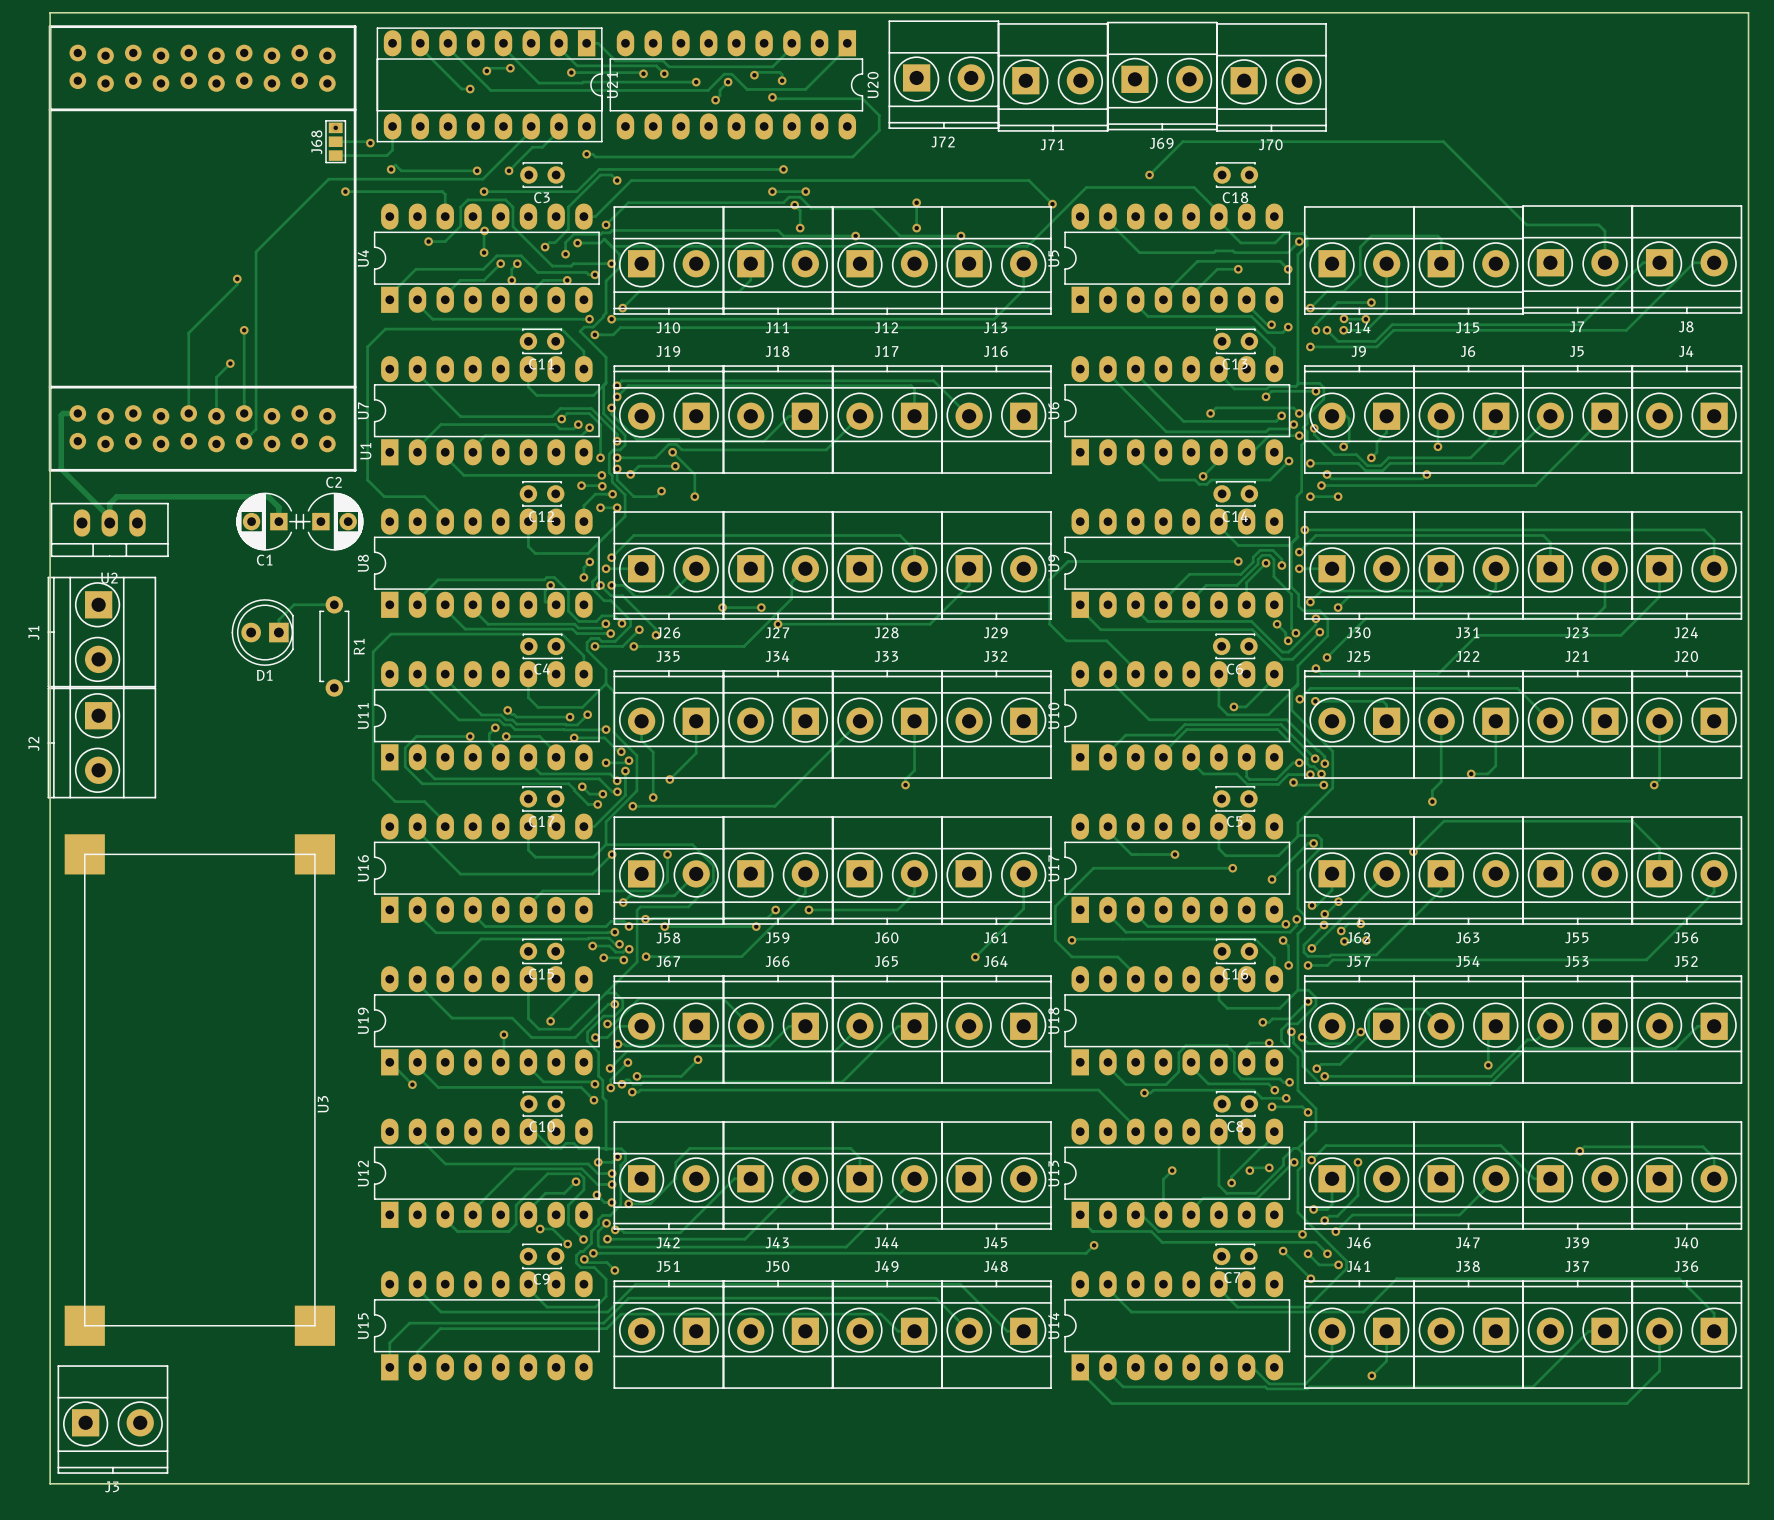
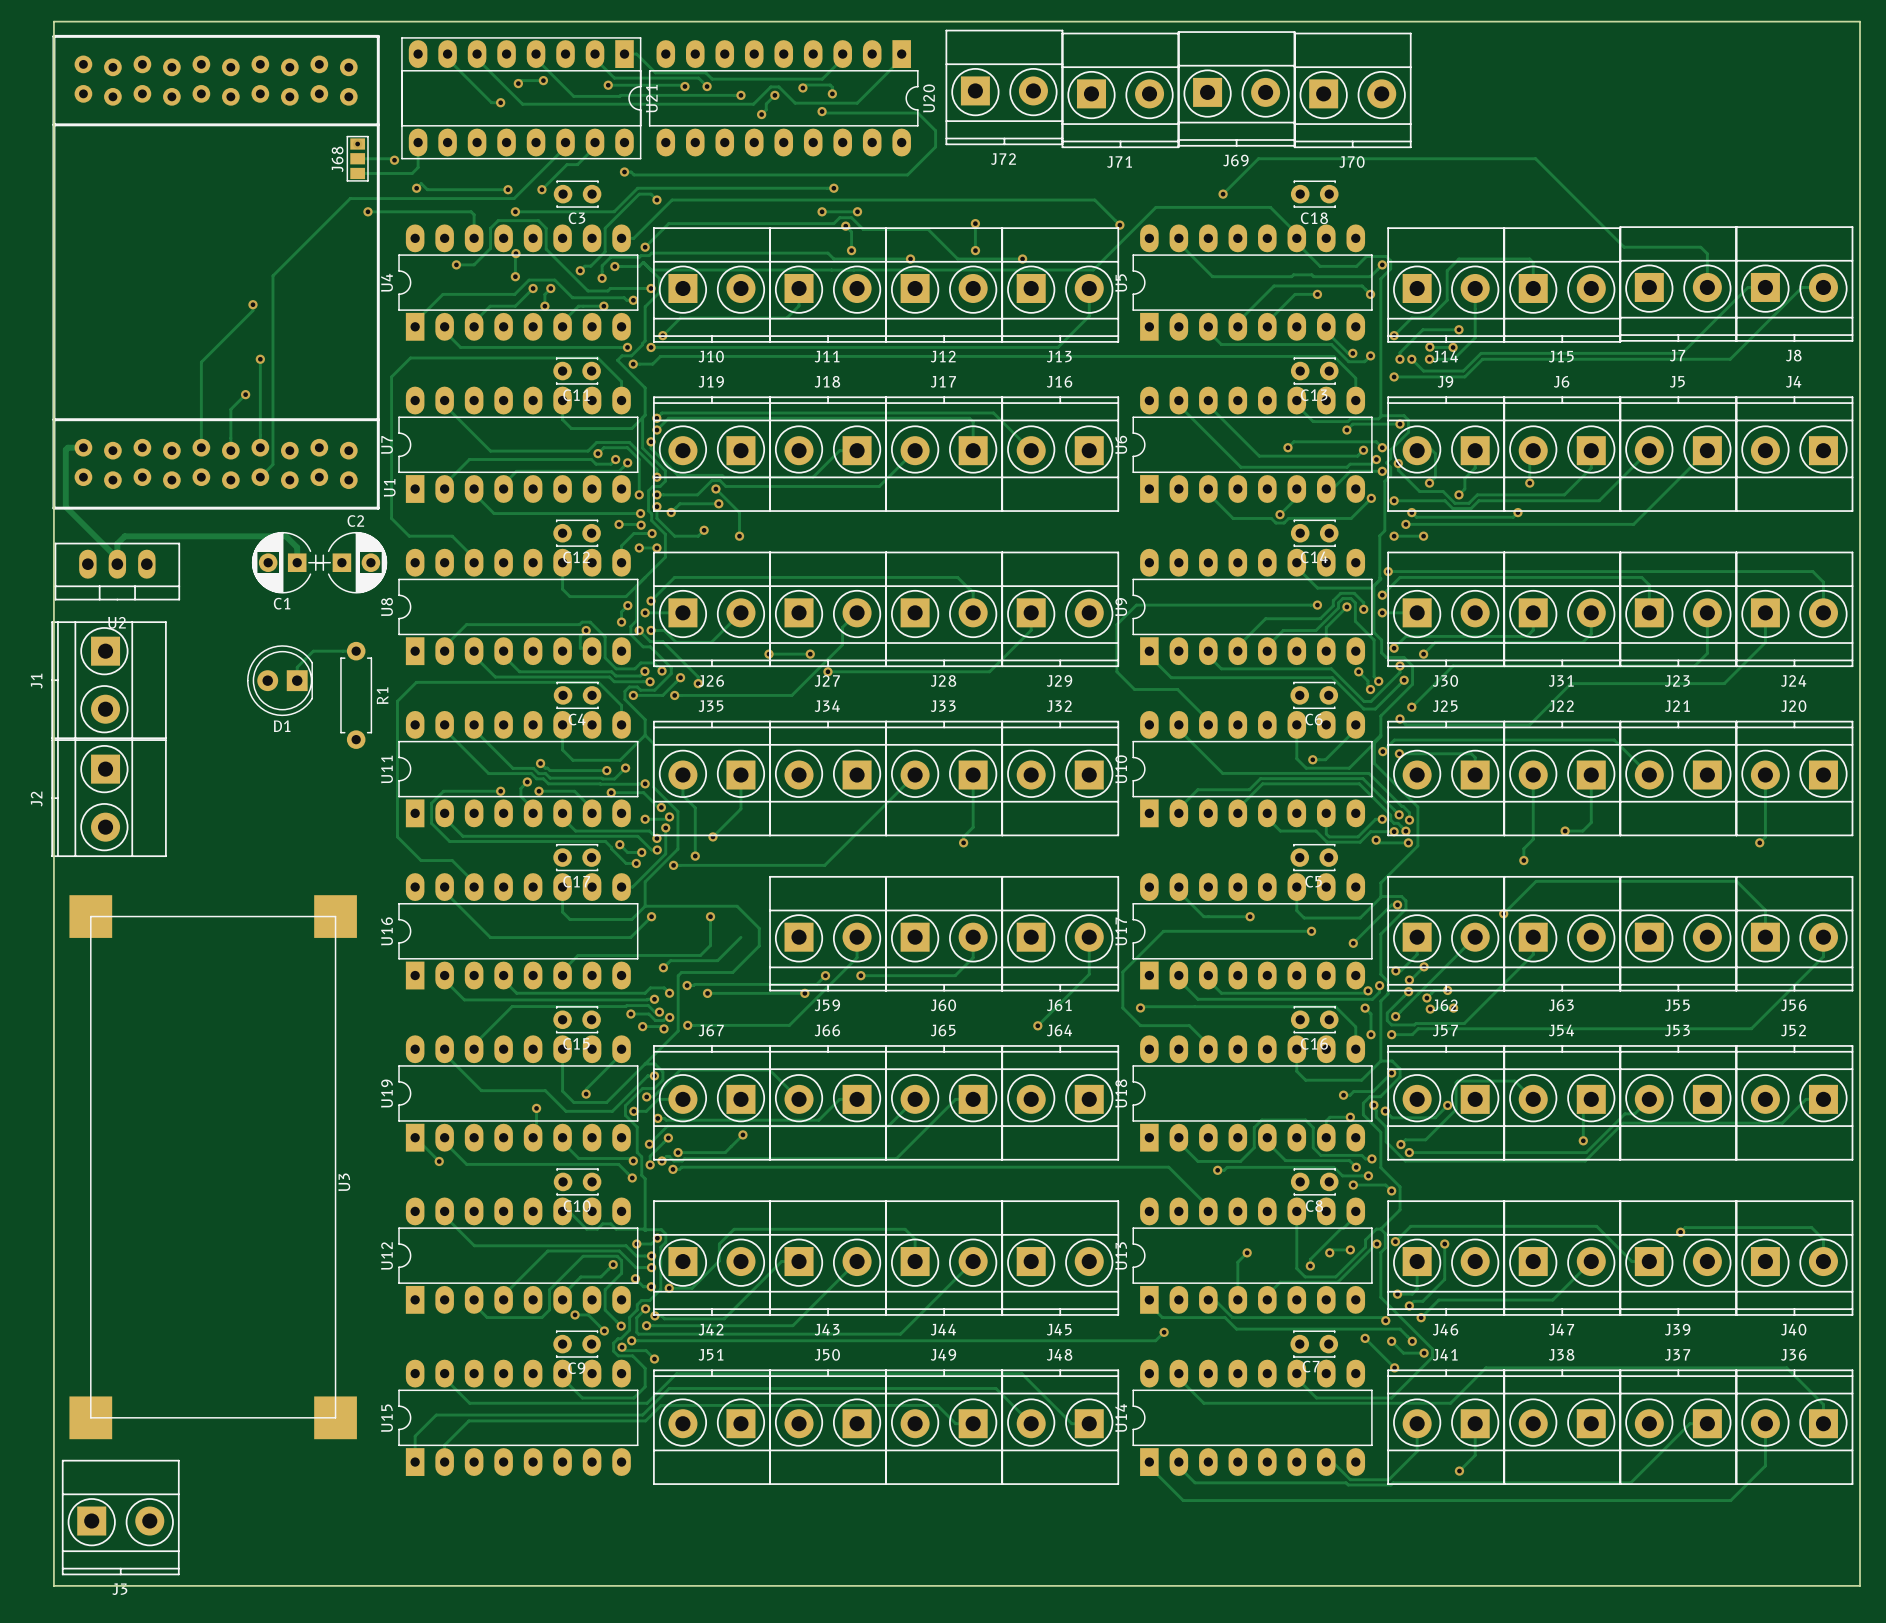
J58: (668, 870) -> none

